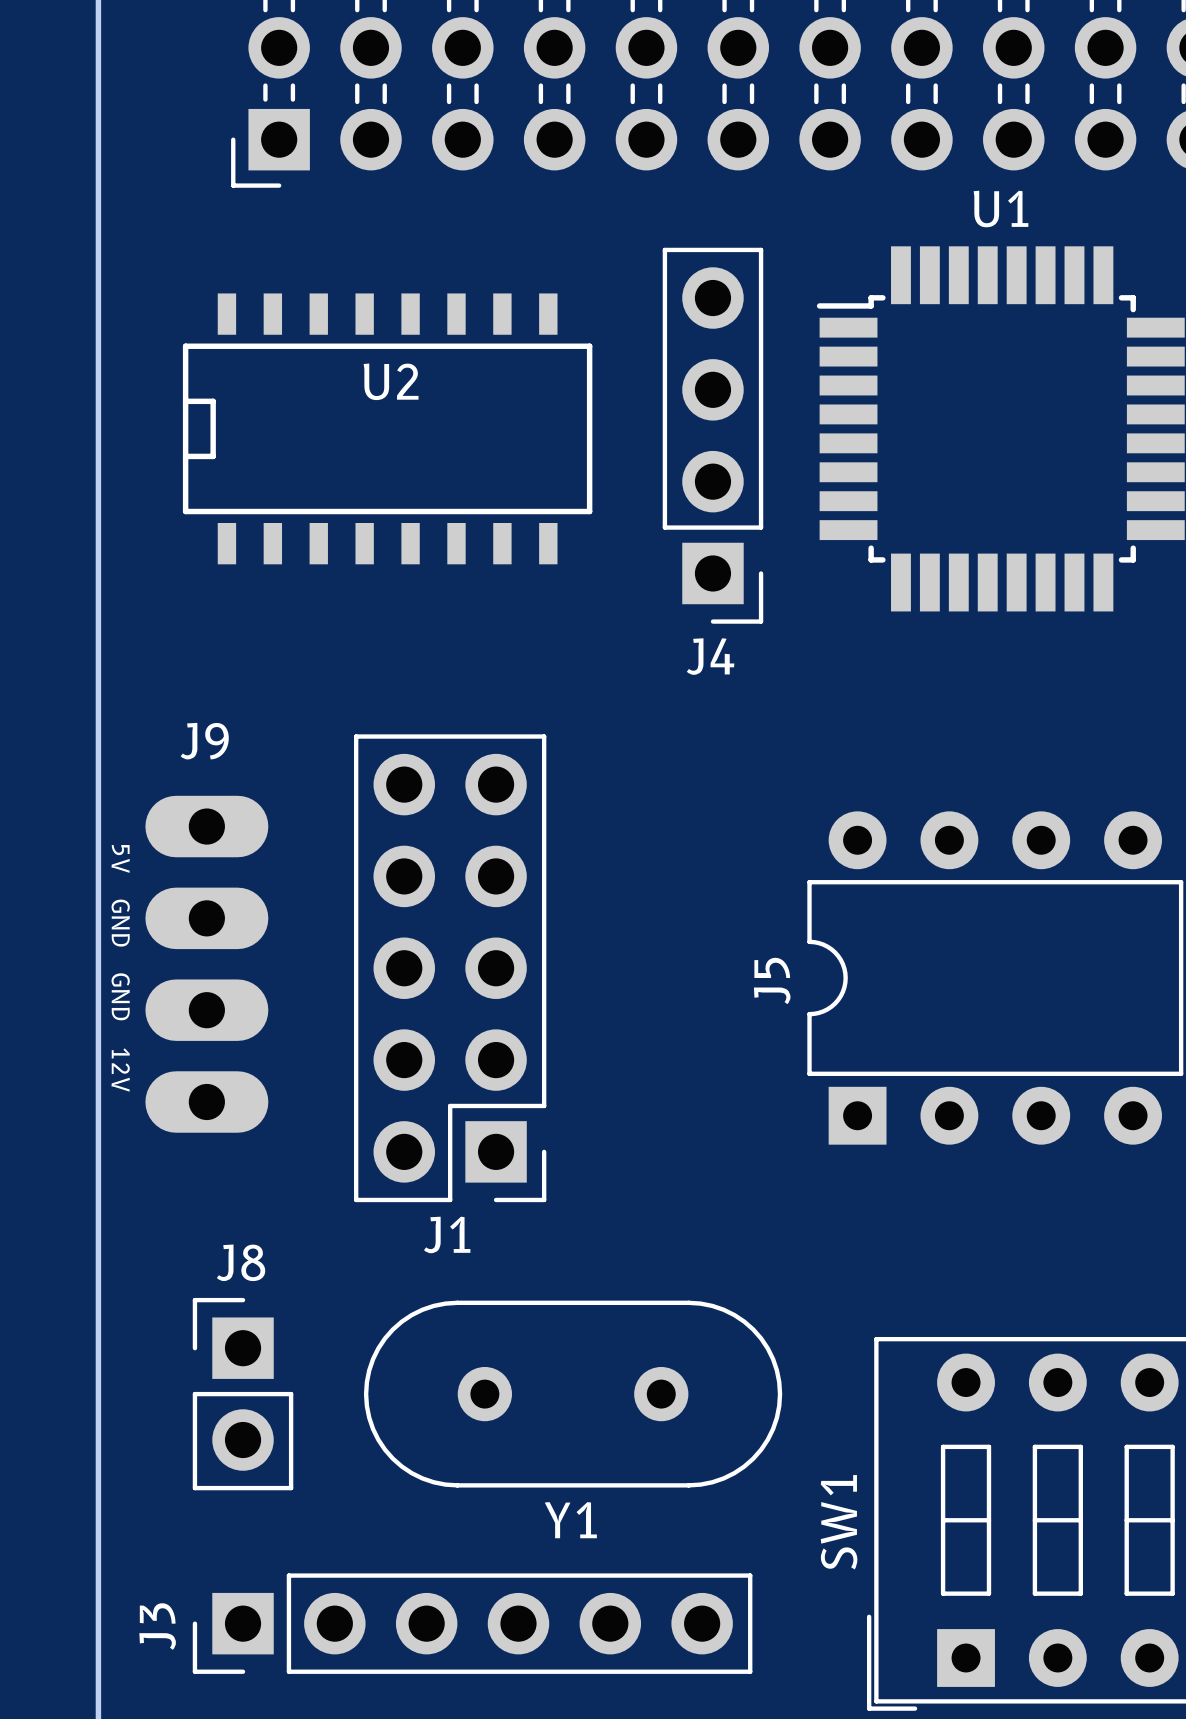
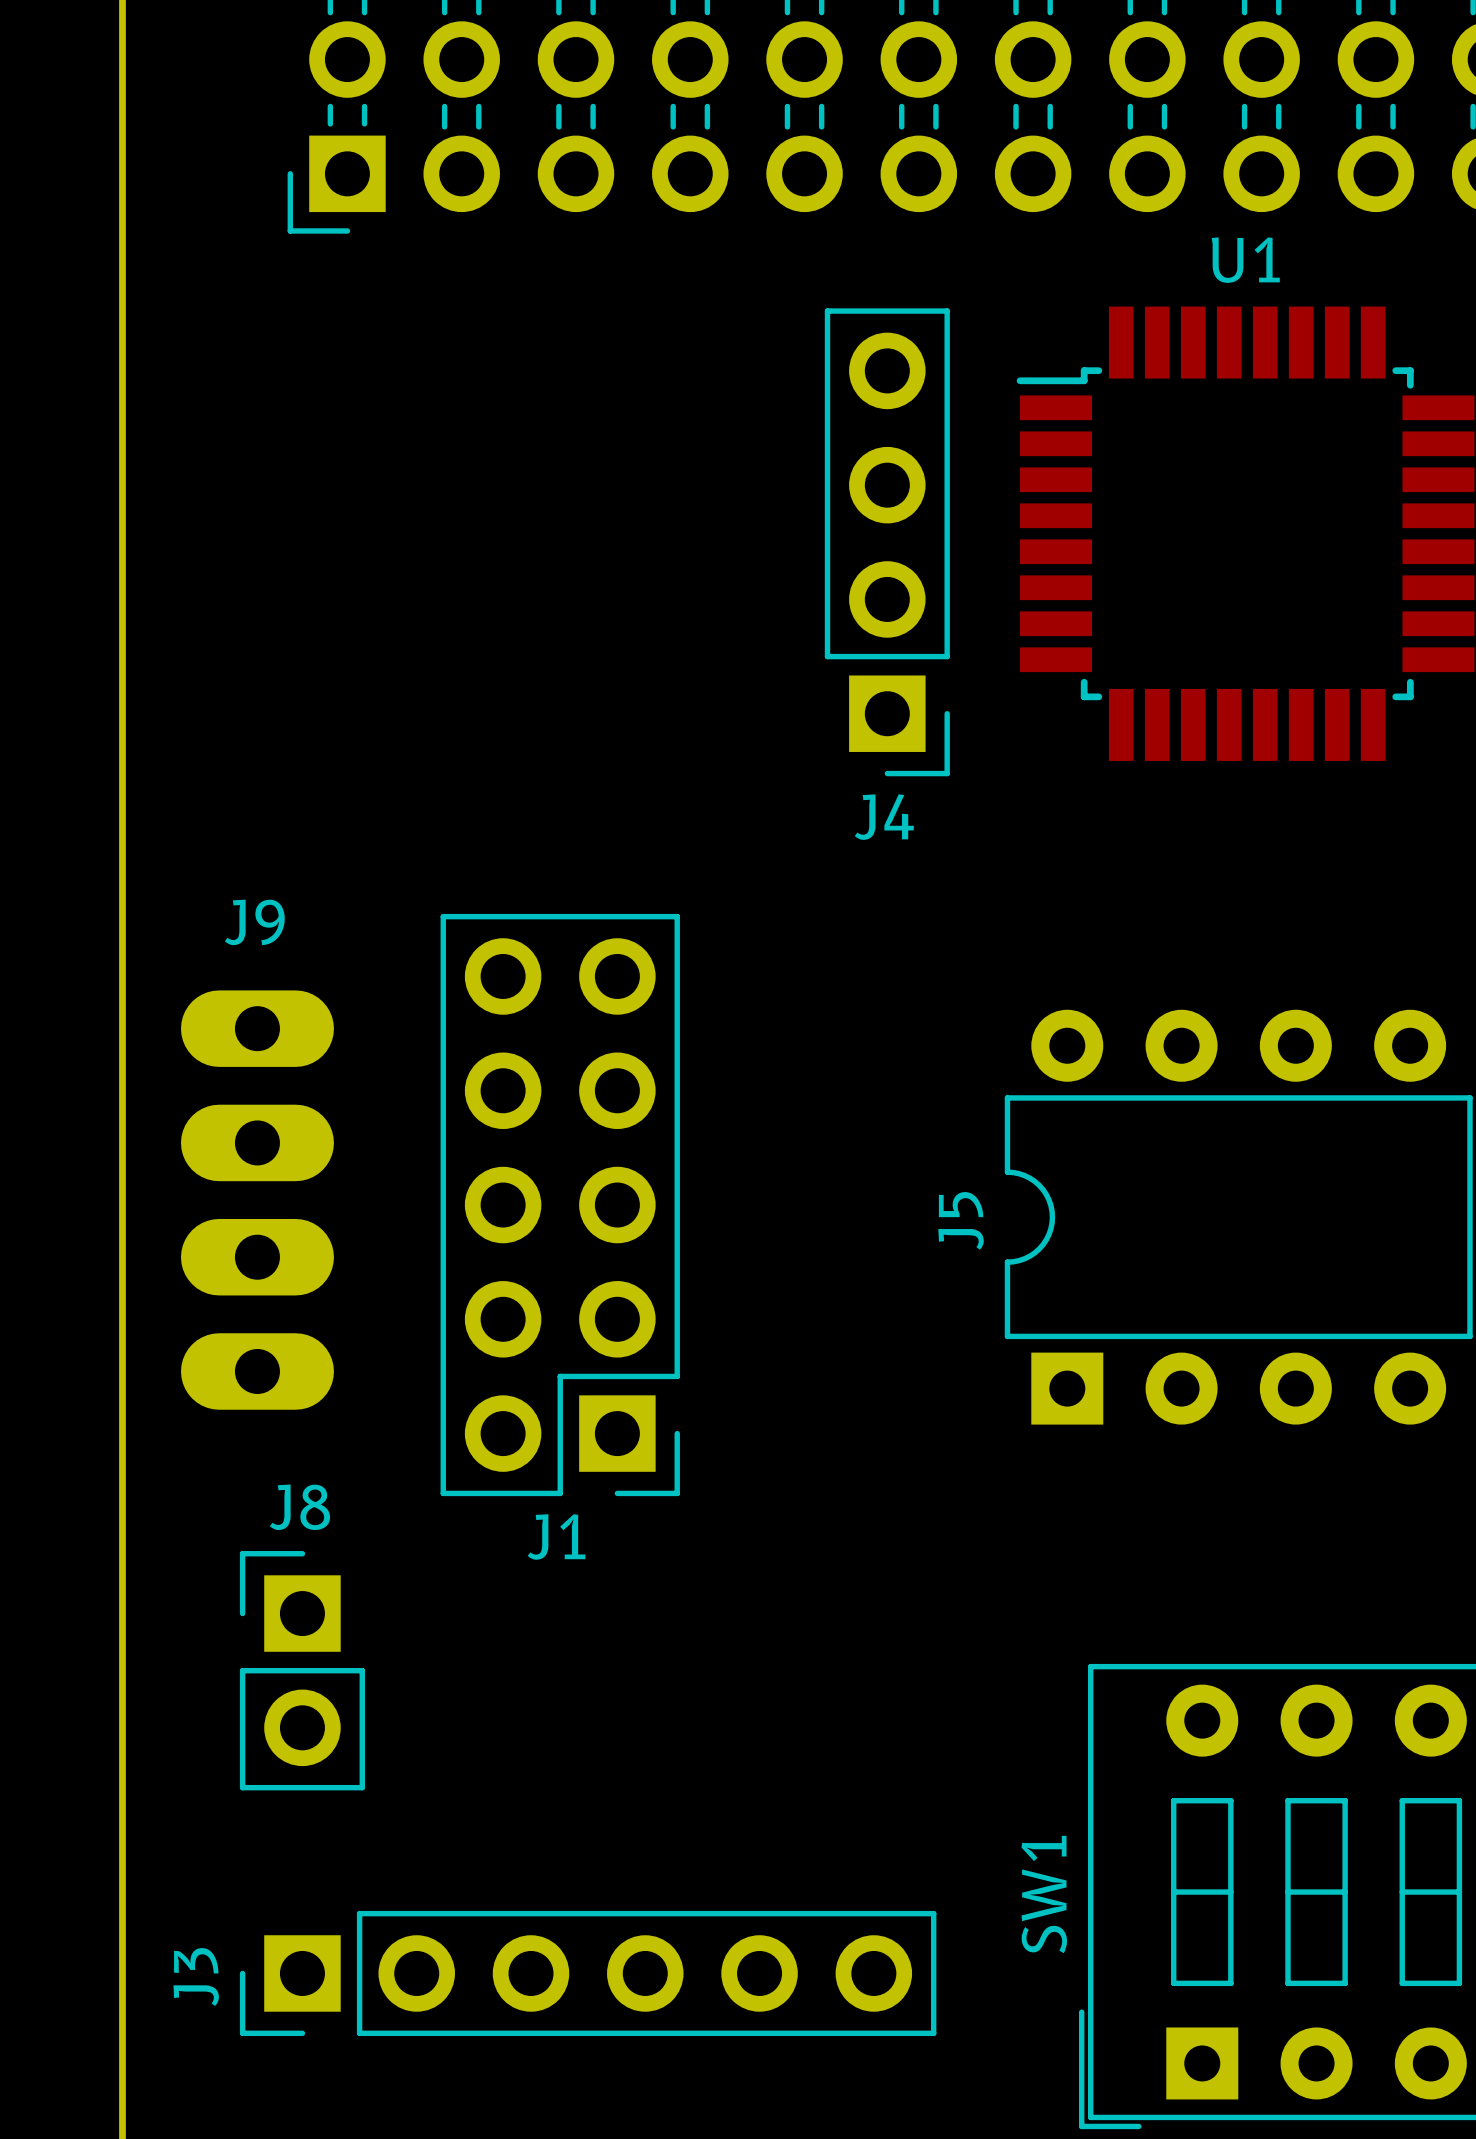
U2: (387, 428) -> none
text: 5V GND GND 12V (120, 968) -> none
J8 position: (243, 1394) -> (302, 1670)
Y1: (573, 1394) -> none
J3 position: (472, 1623) -> (588, 1973)

